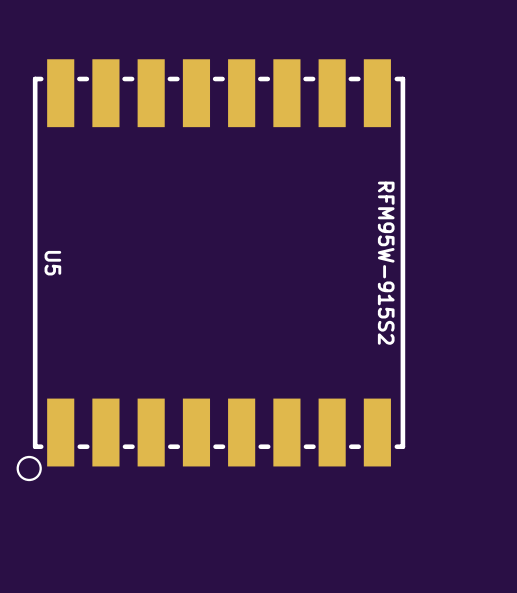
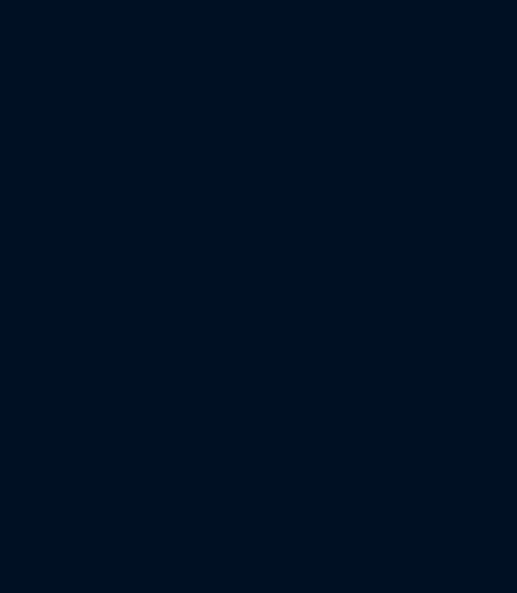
U5: RFM95W-915S2 (210, 270) -> none

